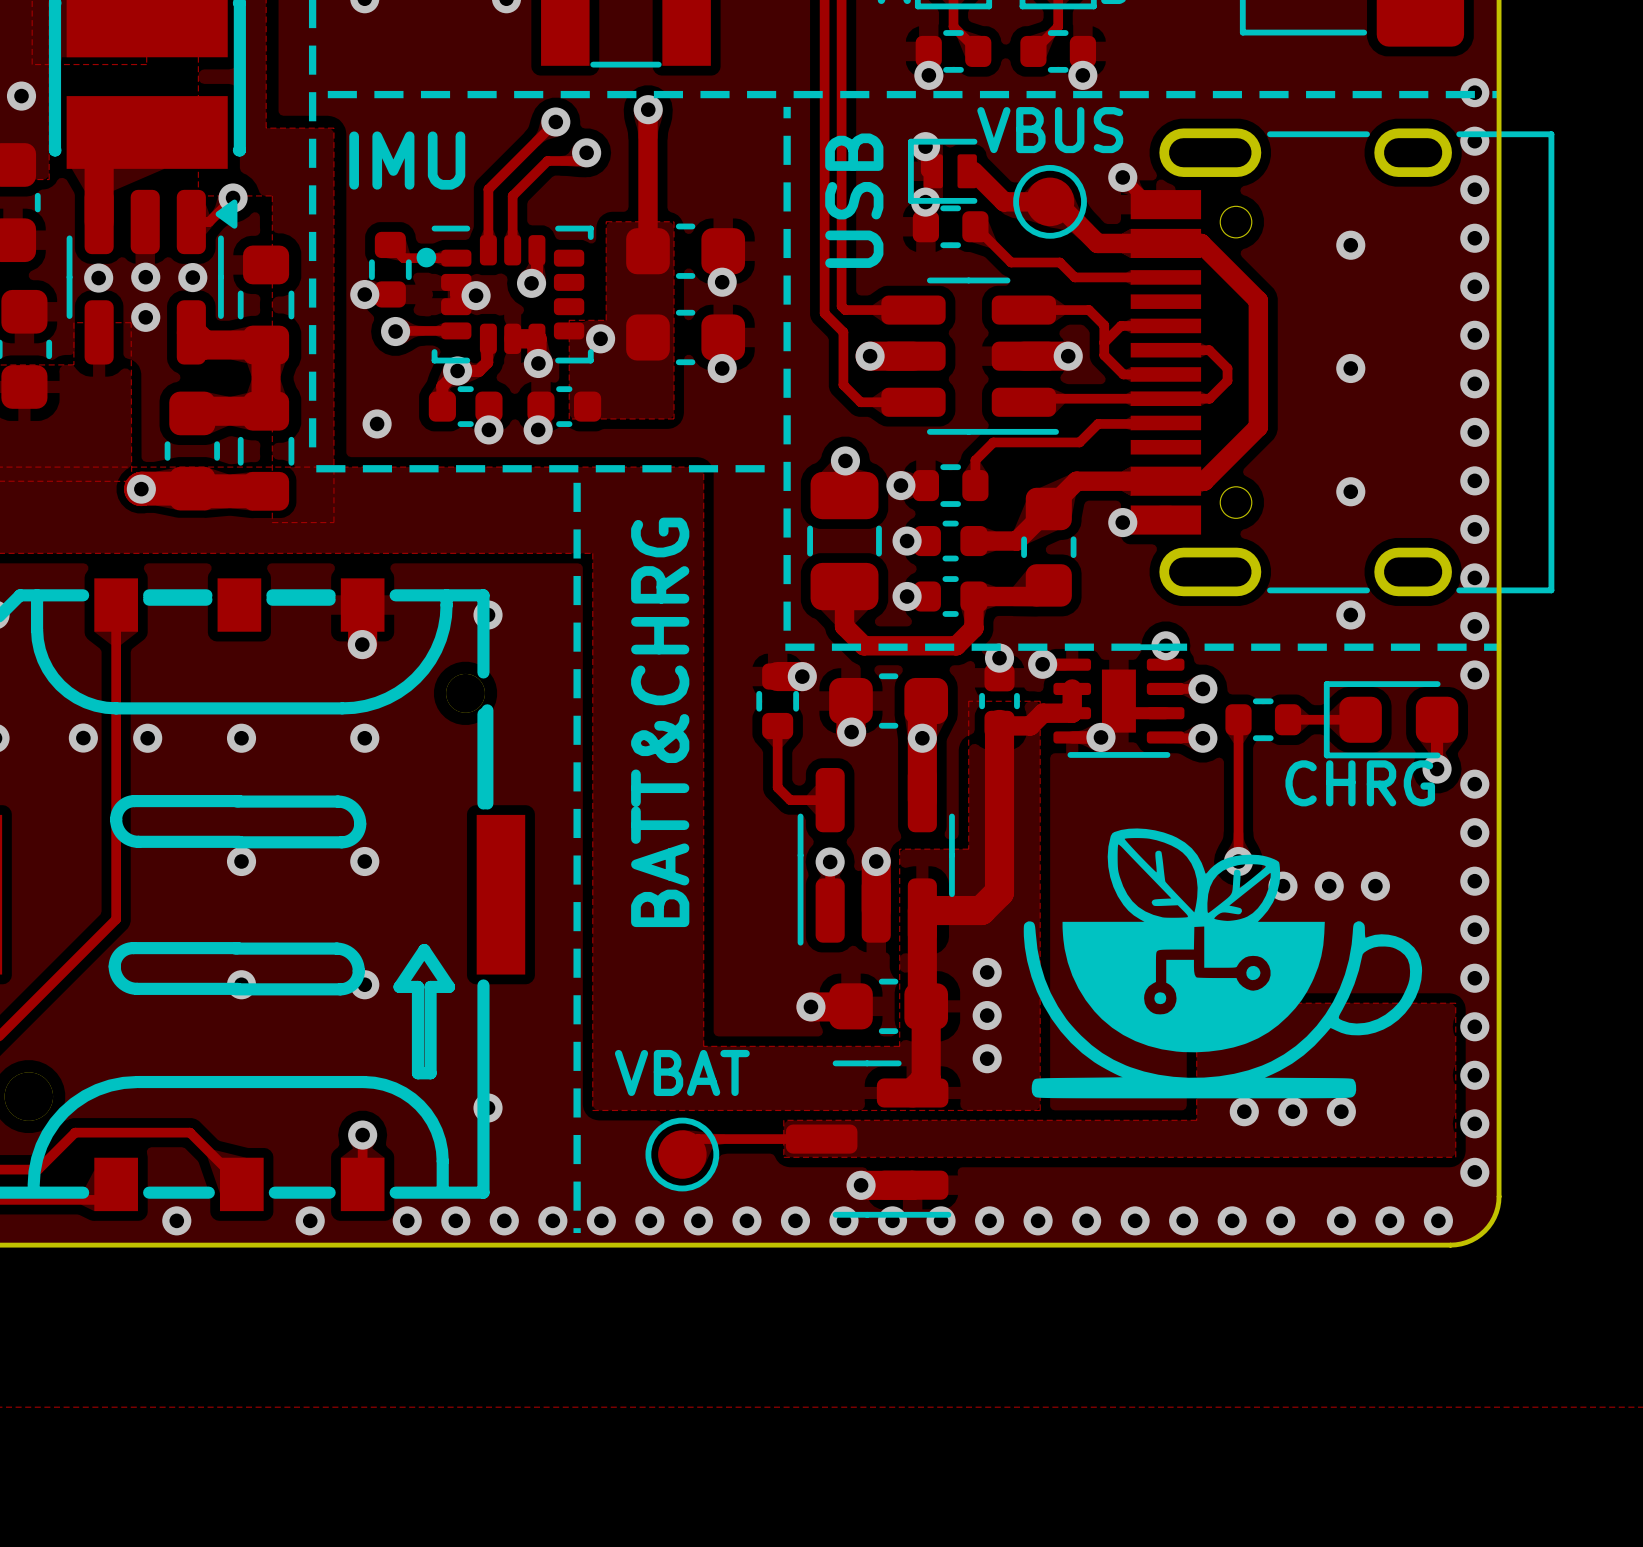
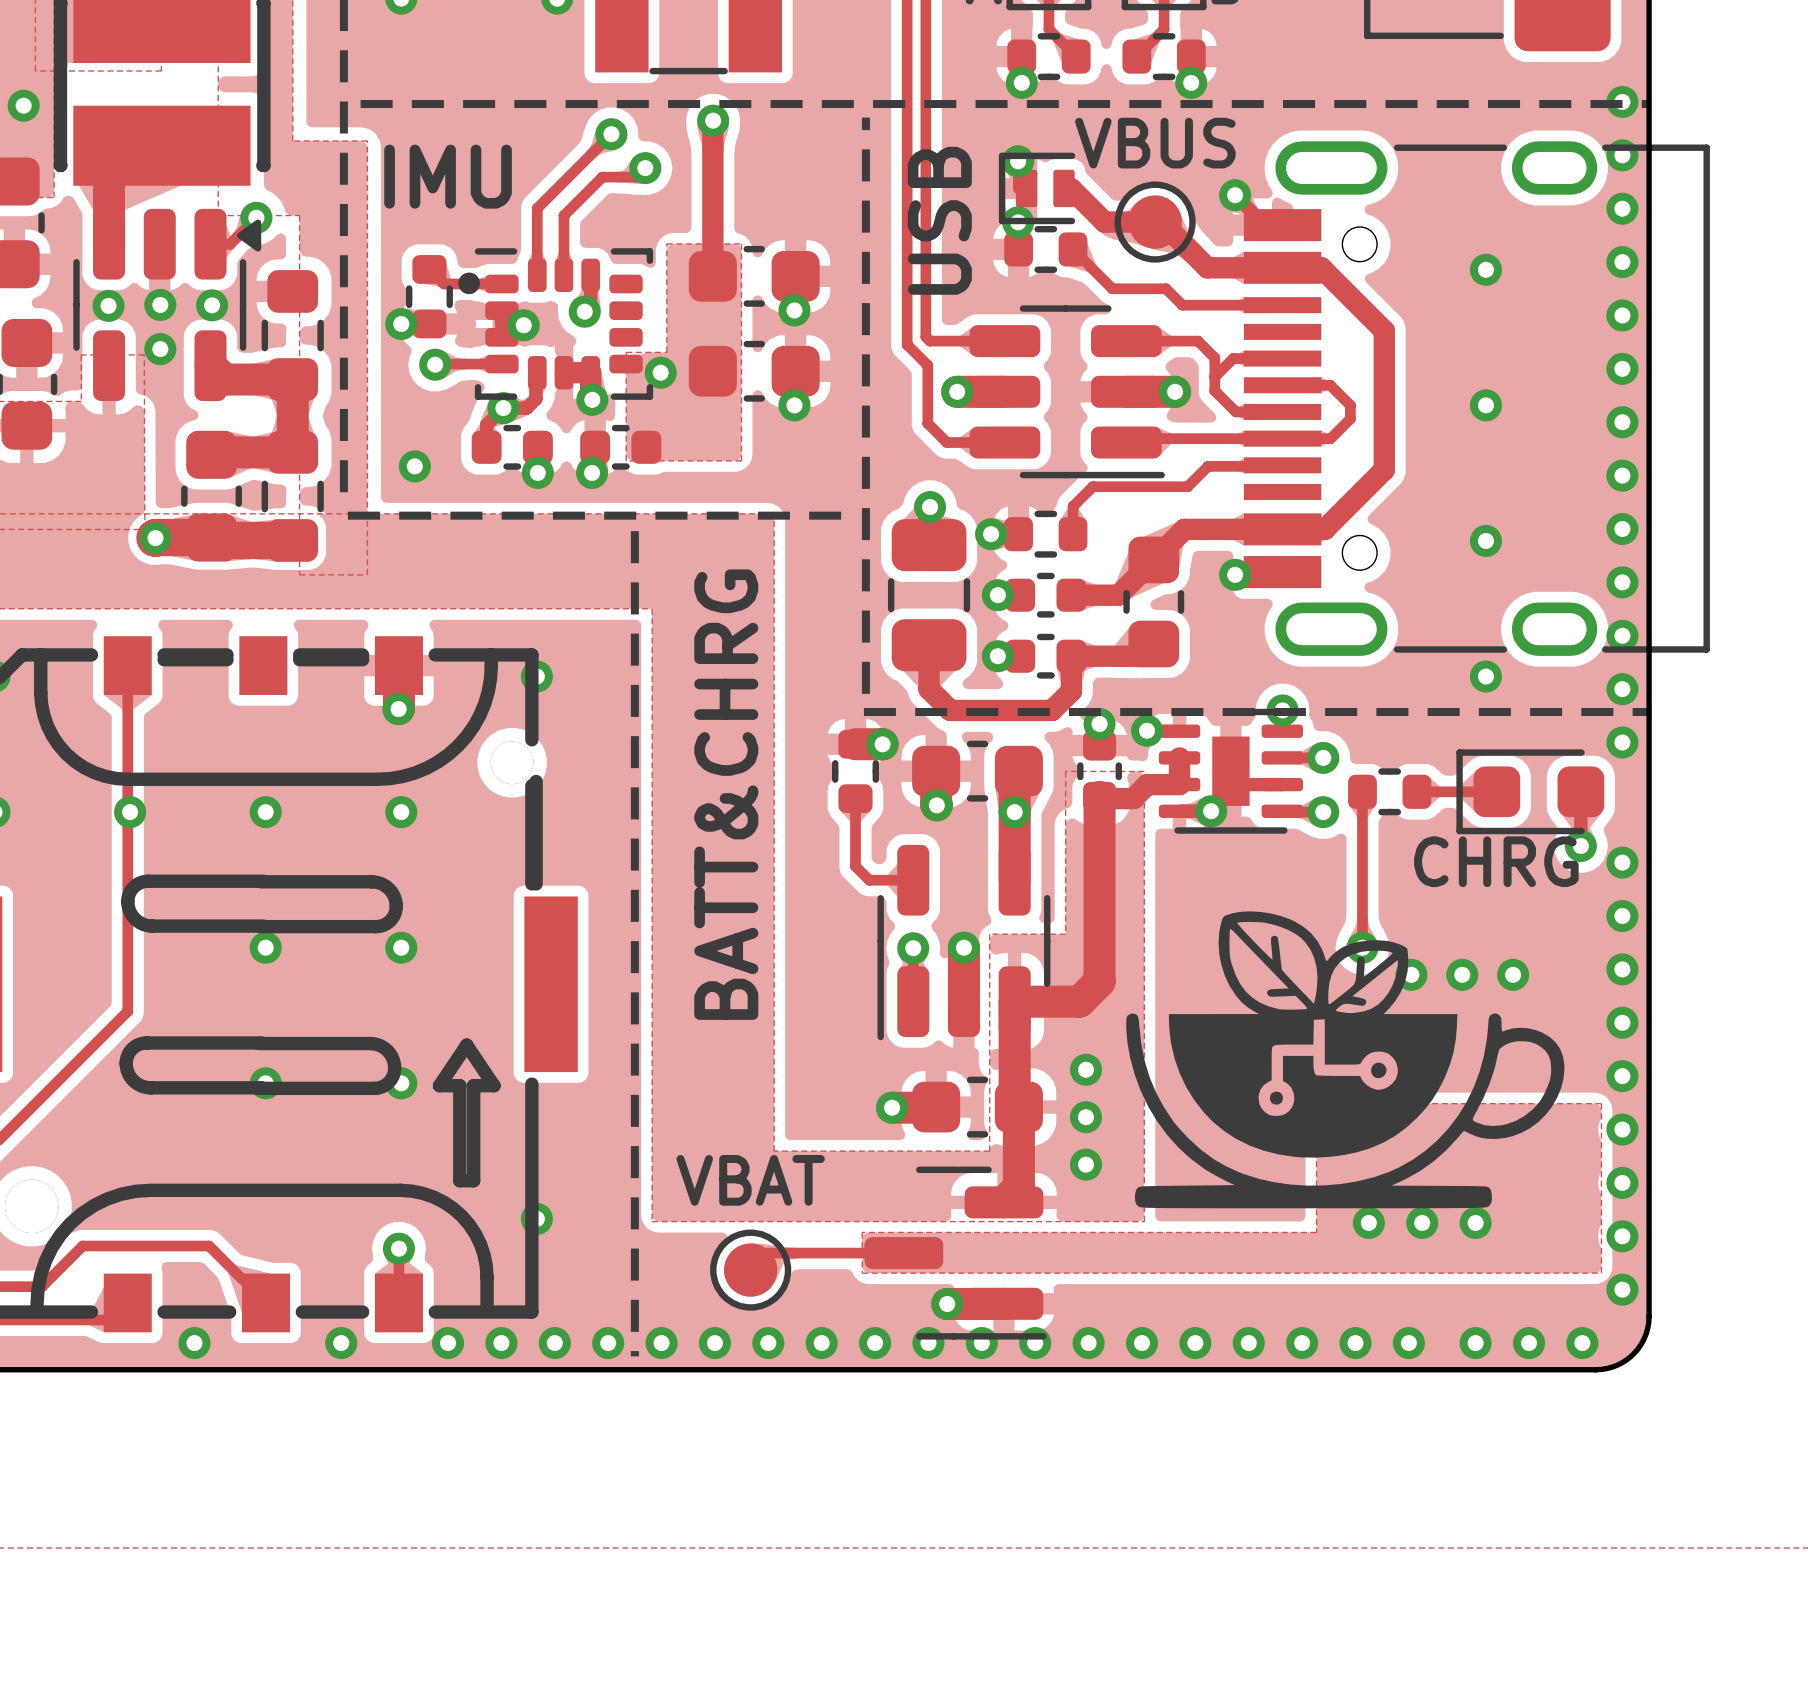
via: (83, 738) -> none
via: none -> (130, 812)
via: (147, 738) -> none

